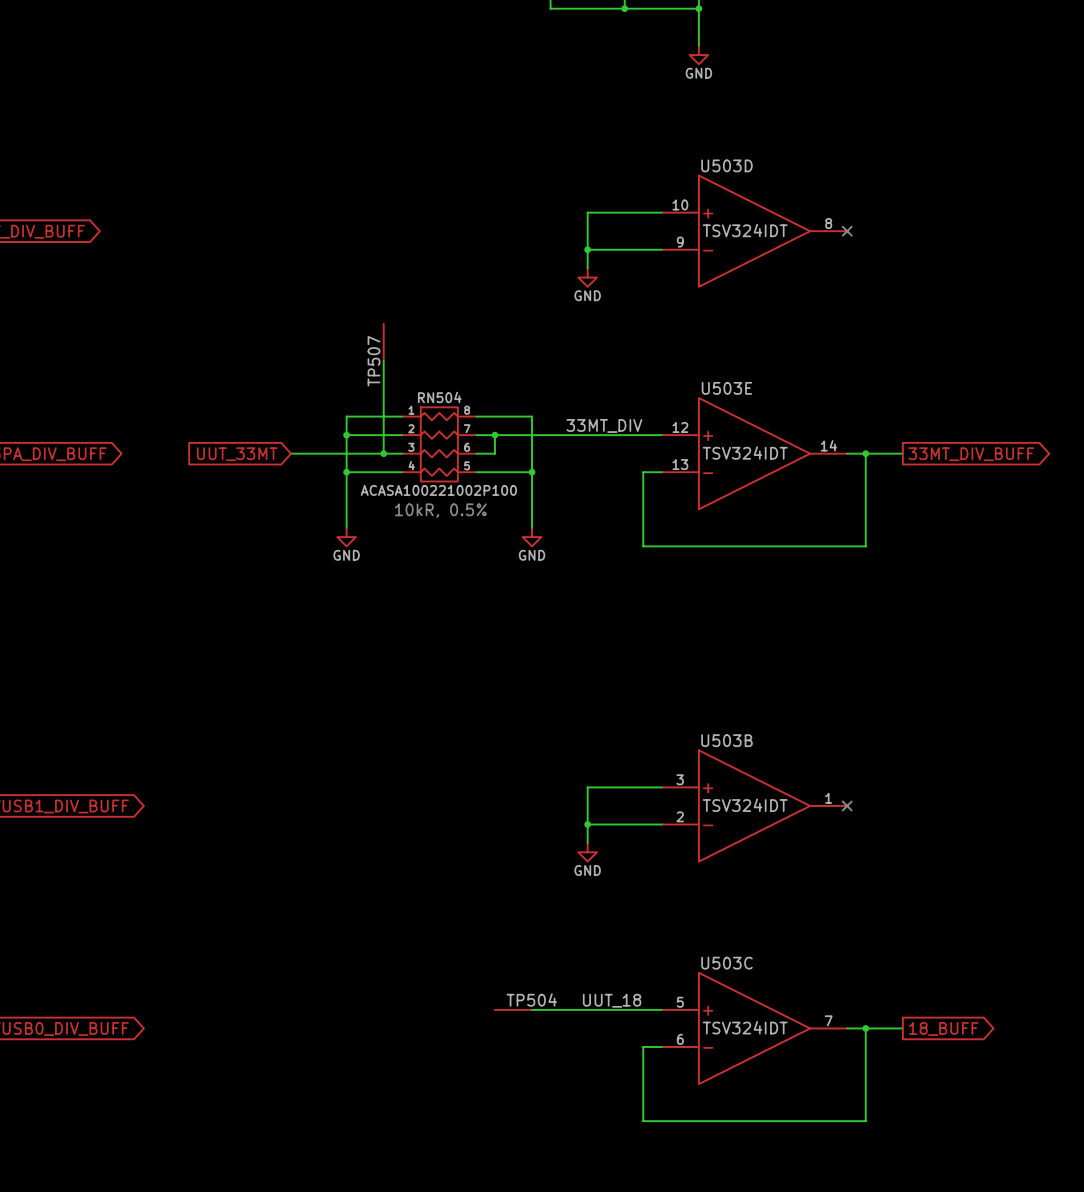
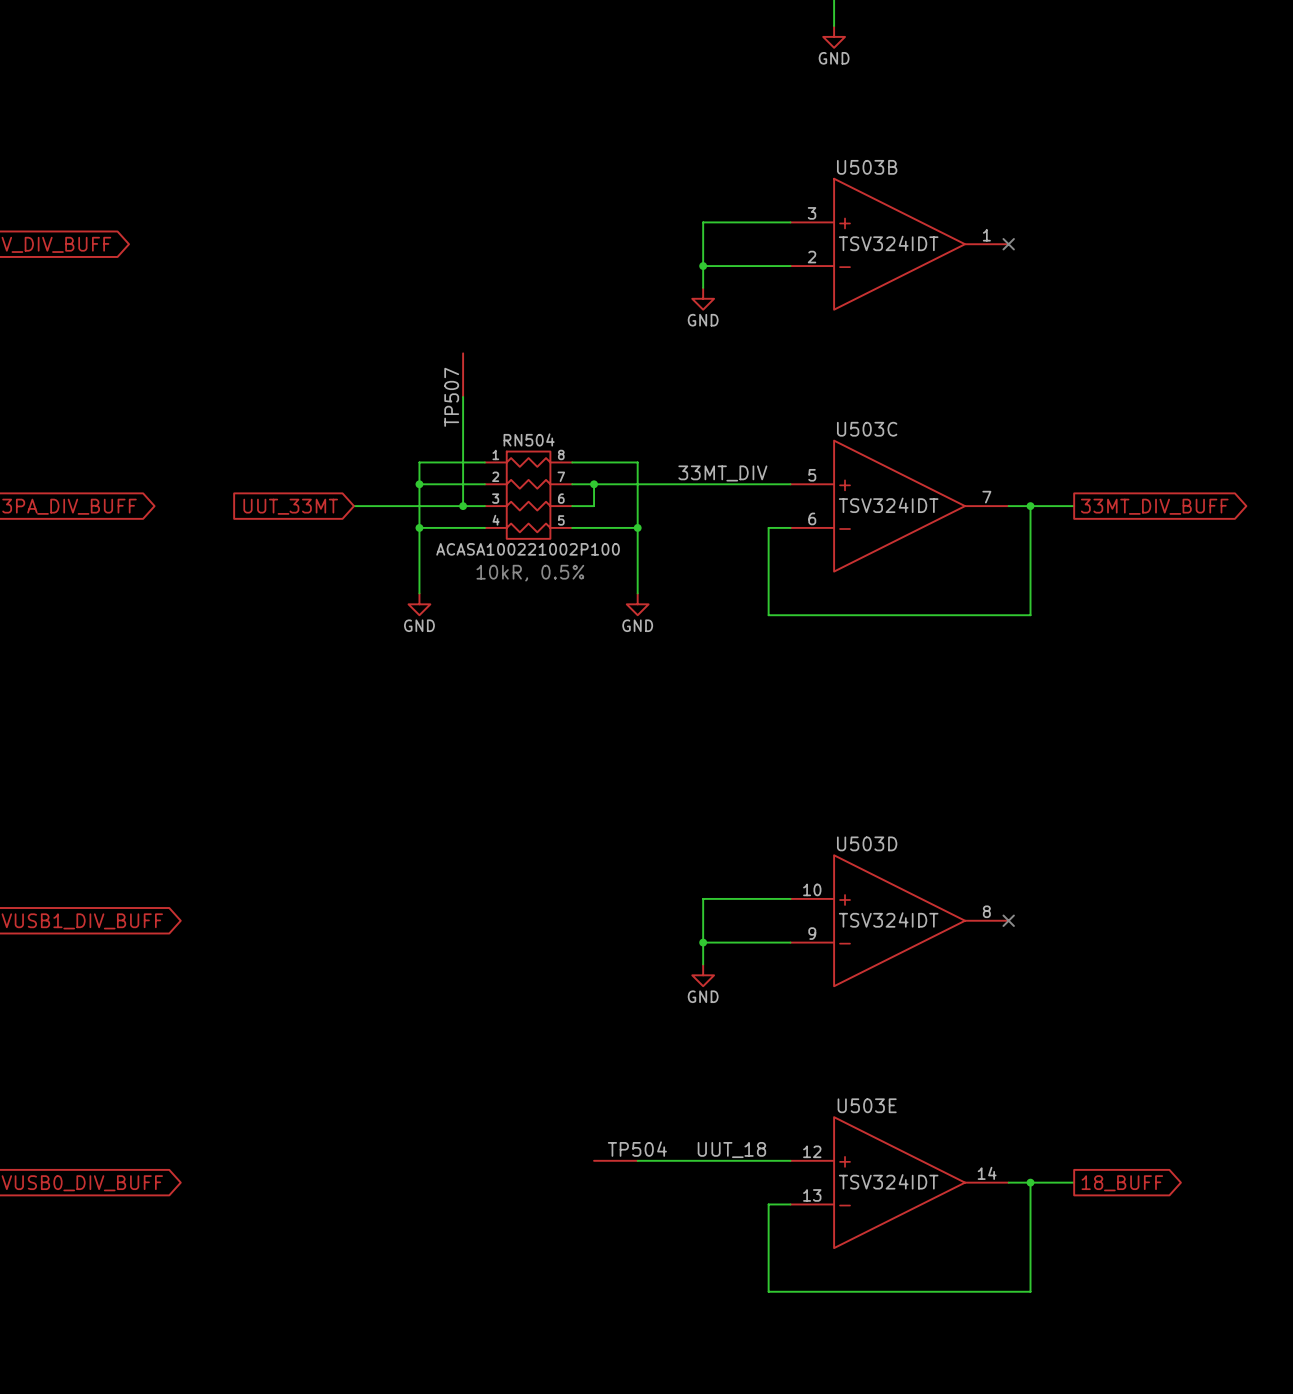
U503D position: (754, 231) -> (899, 920)
U503E position: (754, 453) -> (899, 1182)
U503B position: (754, 805) -> (899, 244)
U503C position: (754, 1028) -> (899, 506)

